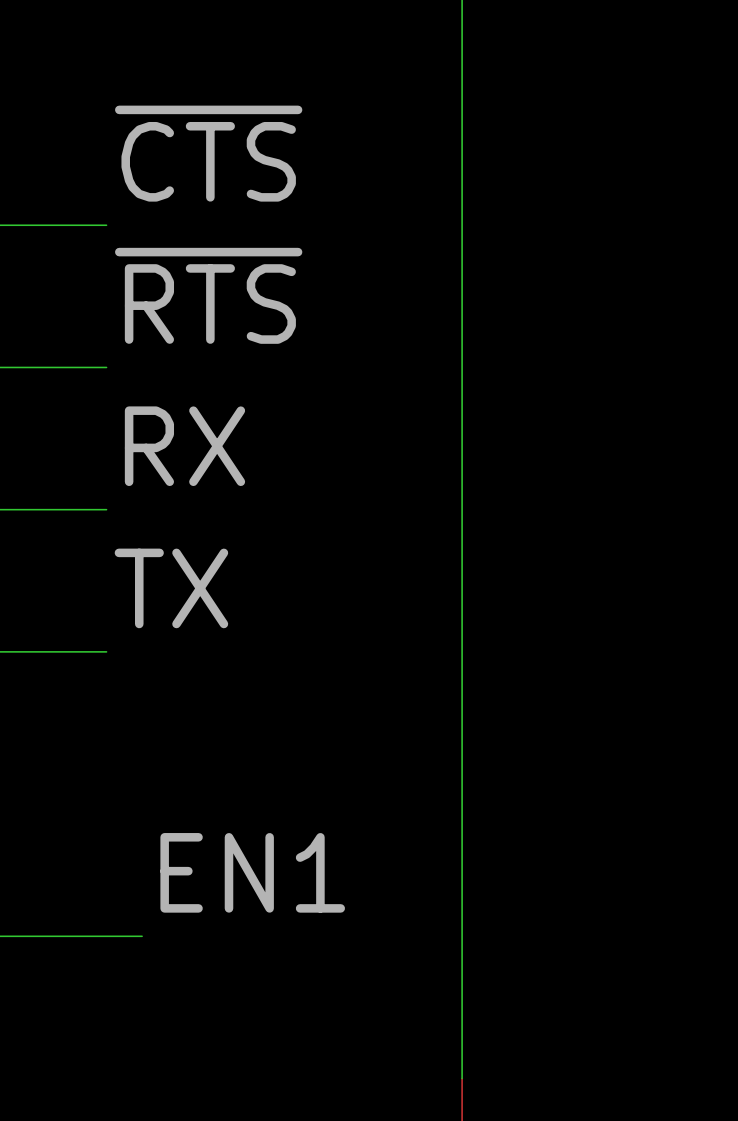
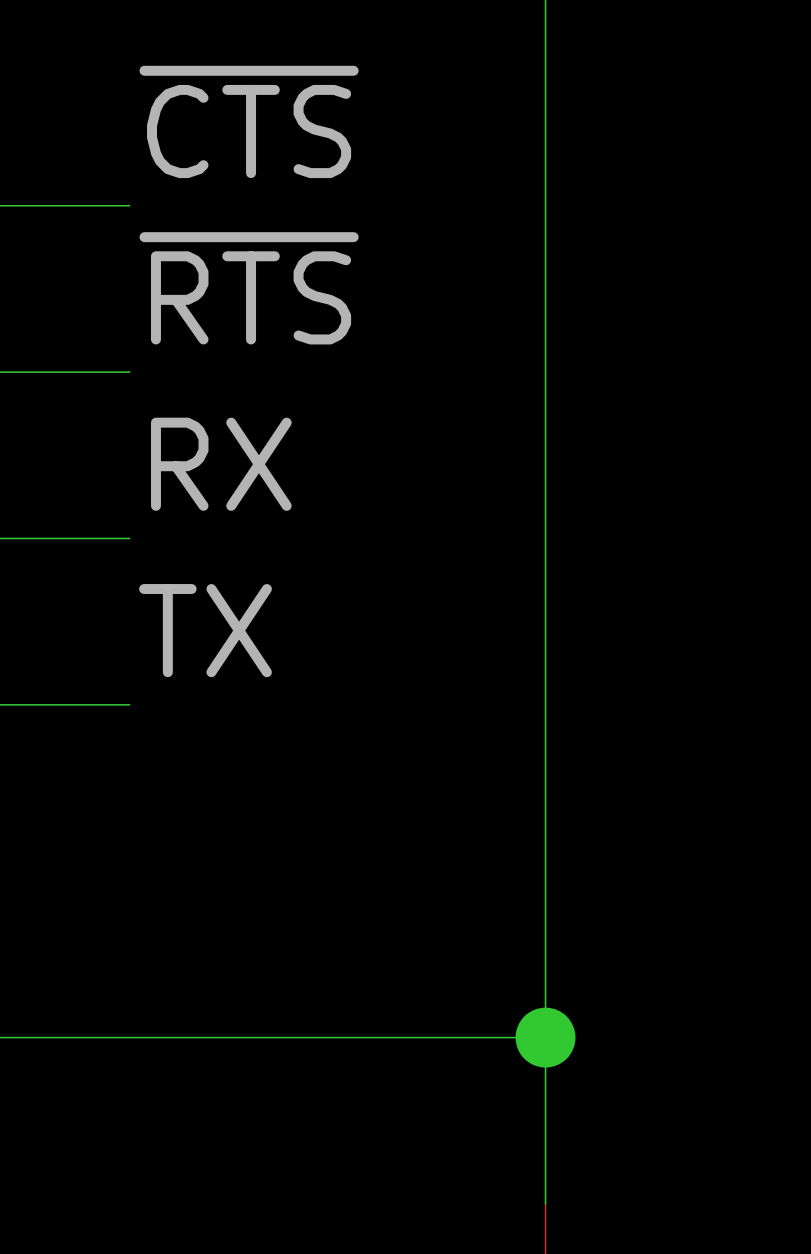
label: EN1 (252, 872) -> none
wire: none -> (171, 1037) (545, 1037)
junction: none -> (545, 1037)

